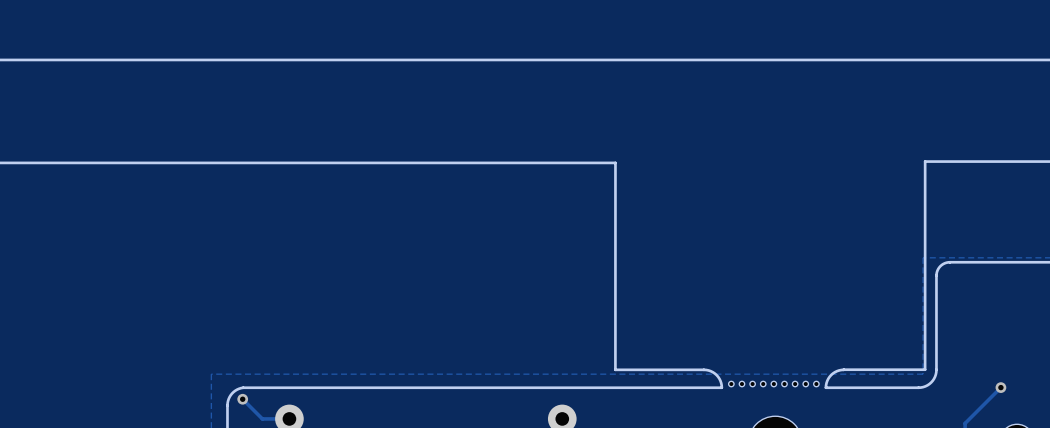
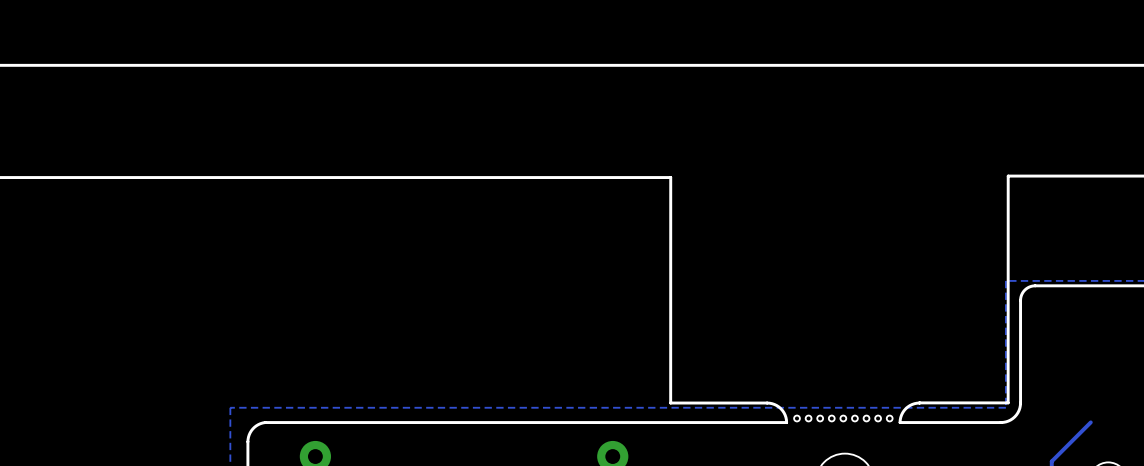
via: (1000, 387) -> none
track: (242, 399) (262, 418) (289, 418) -> none
via: (242, 399) -> none

